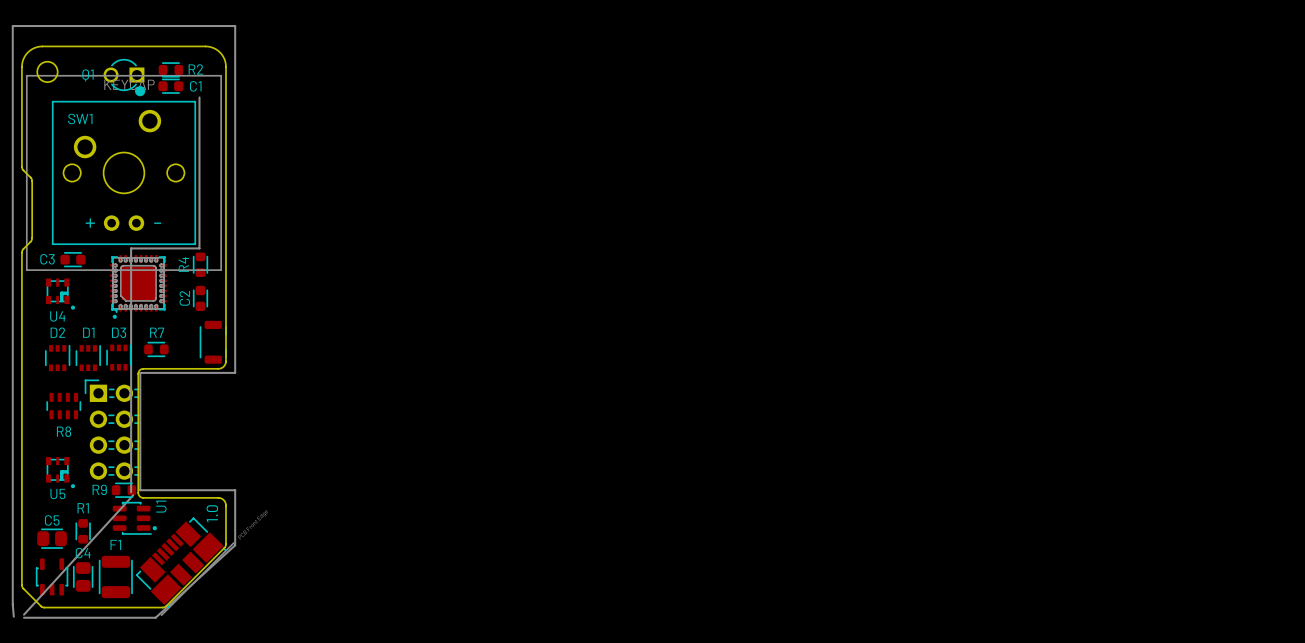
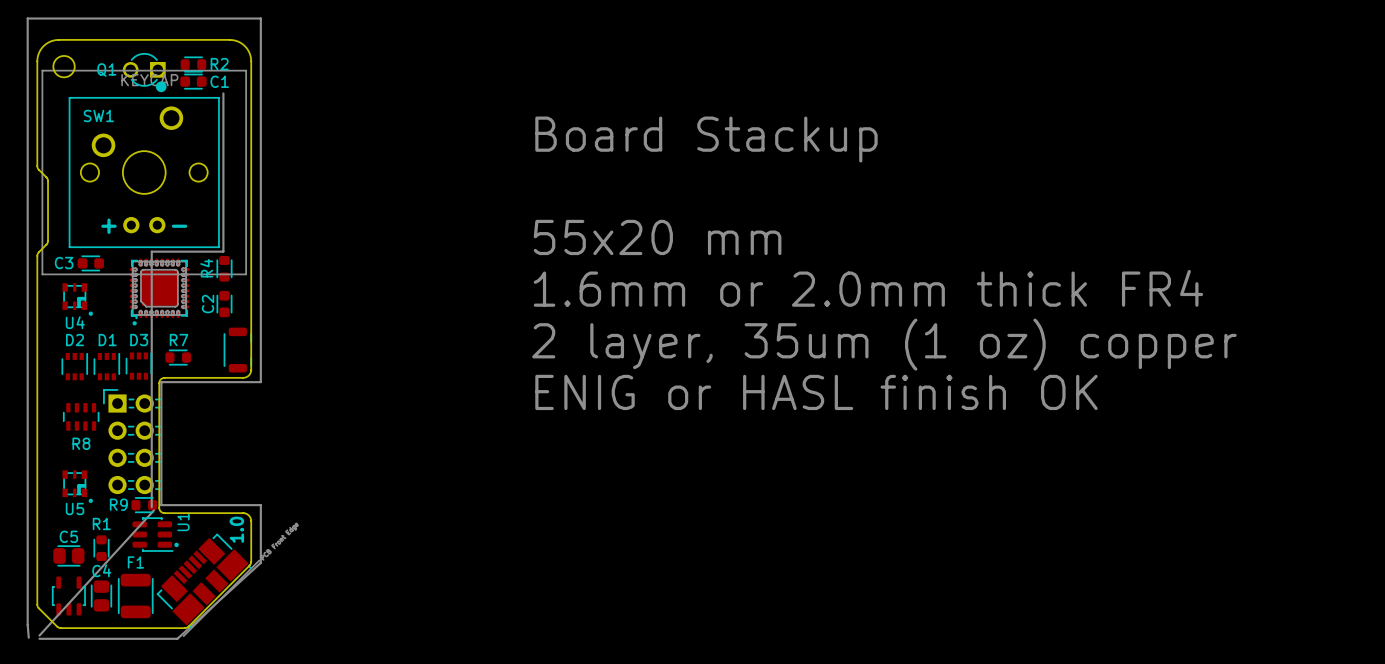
text: none -> Board Stackup (706, 139)
text: none -> 55x20 mm (657, 237)
text: none -> 1.6mm or 2.0mm thick FR4 (868, 288)
text: none -> 2 layer, 35um (1 oz) copper (884, 344)
text: none -> ENIG or HASL finish OK (816, 392)

